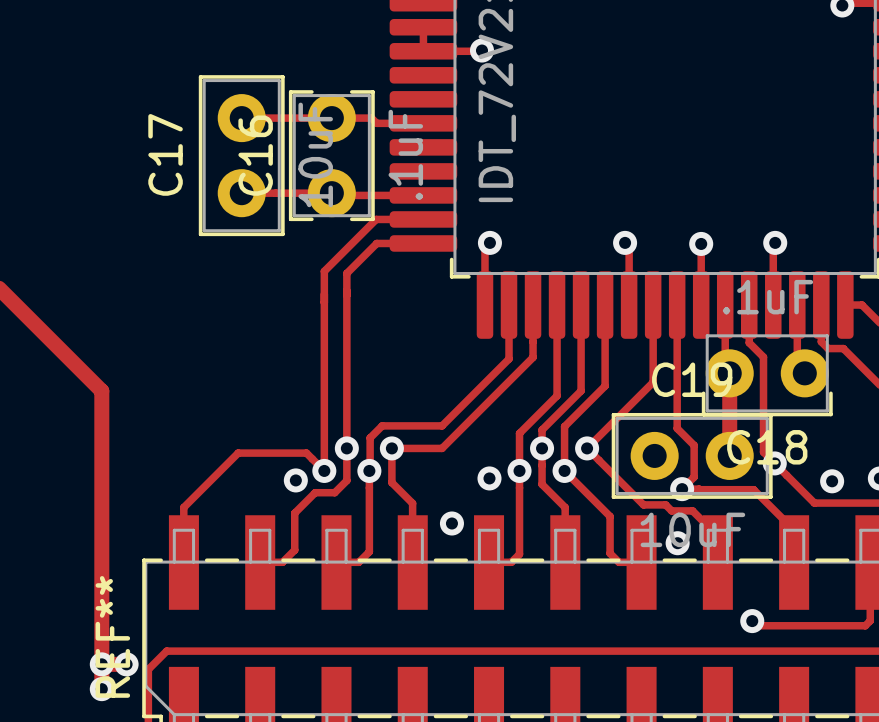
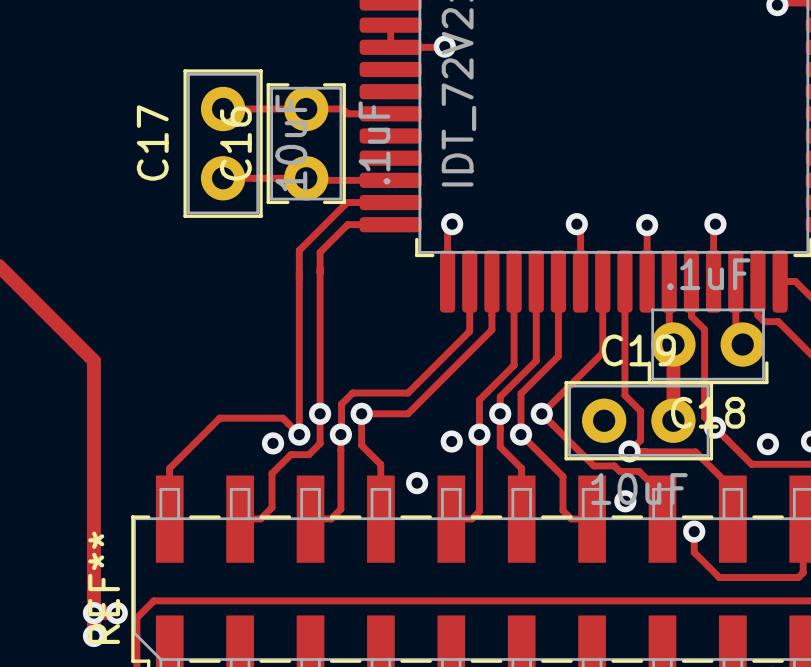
track: (752, 621) (756, 625) (779, 625) -> (694, 531) (694, 552) (719, 577)
via position: (752, 621) -> (694, 531)

